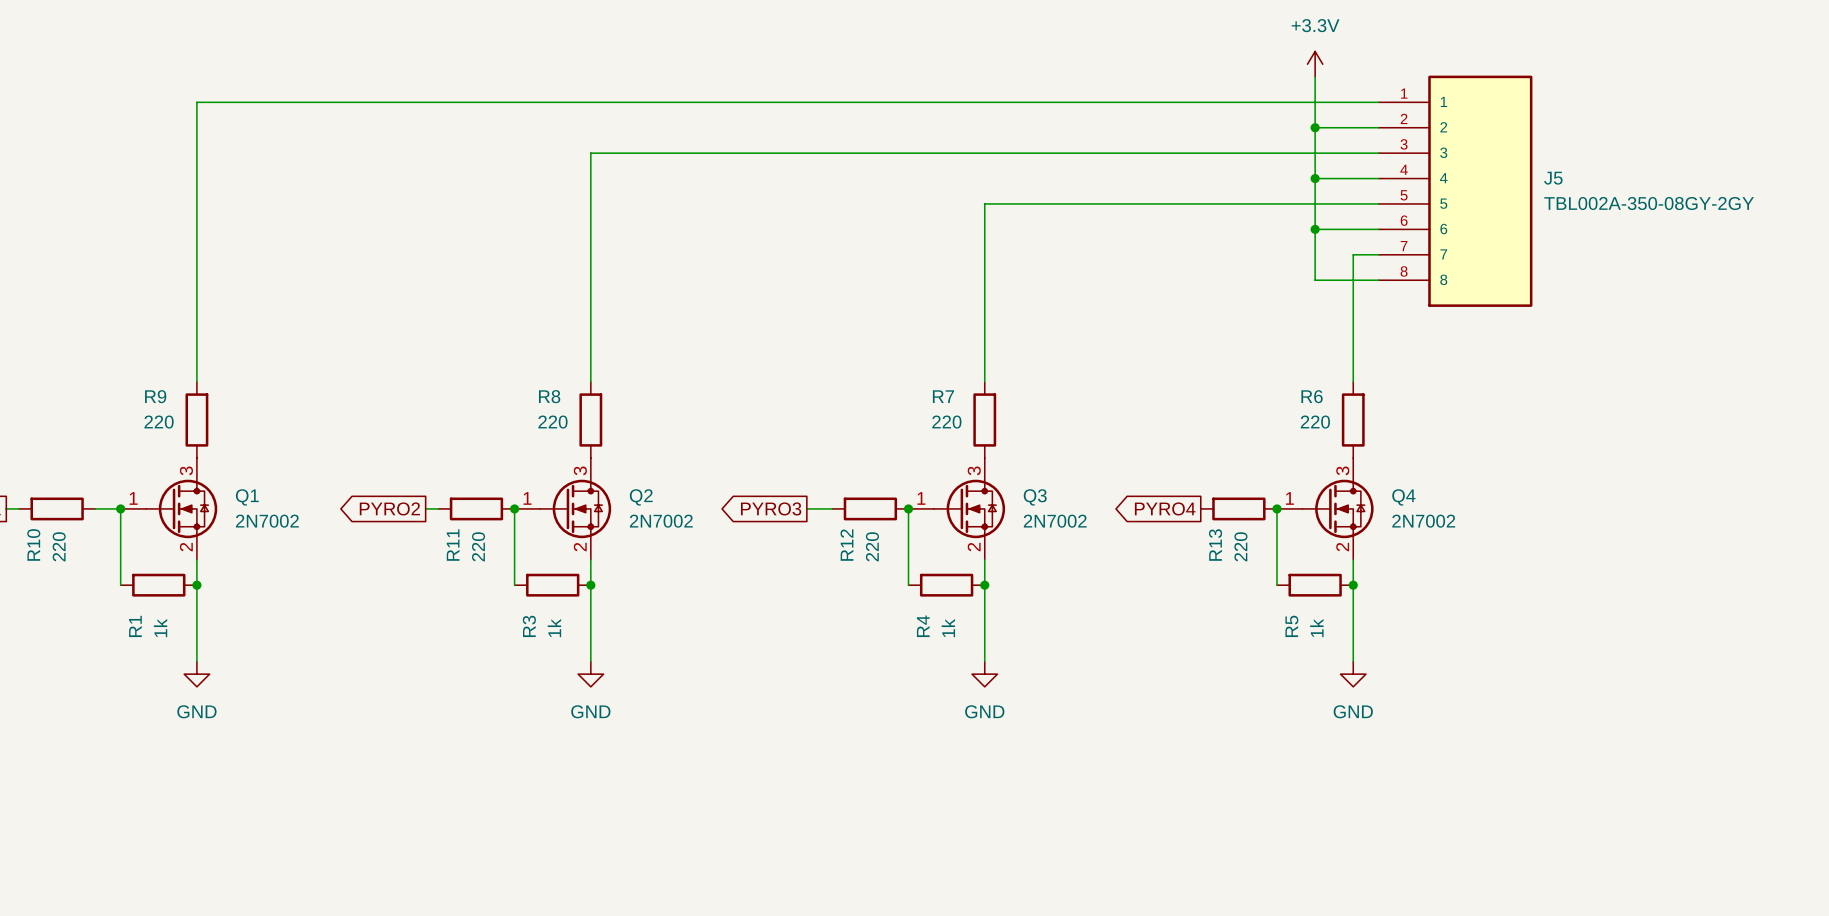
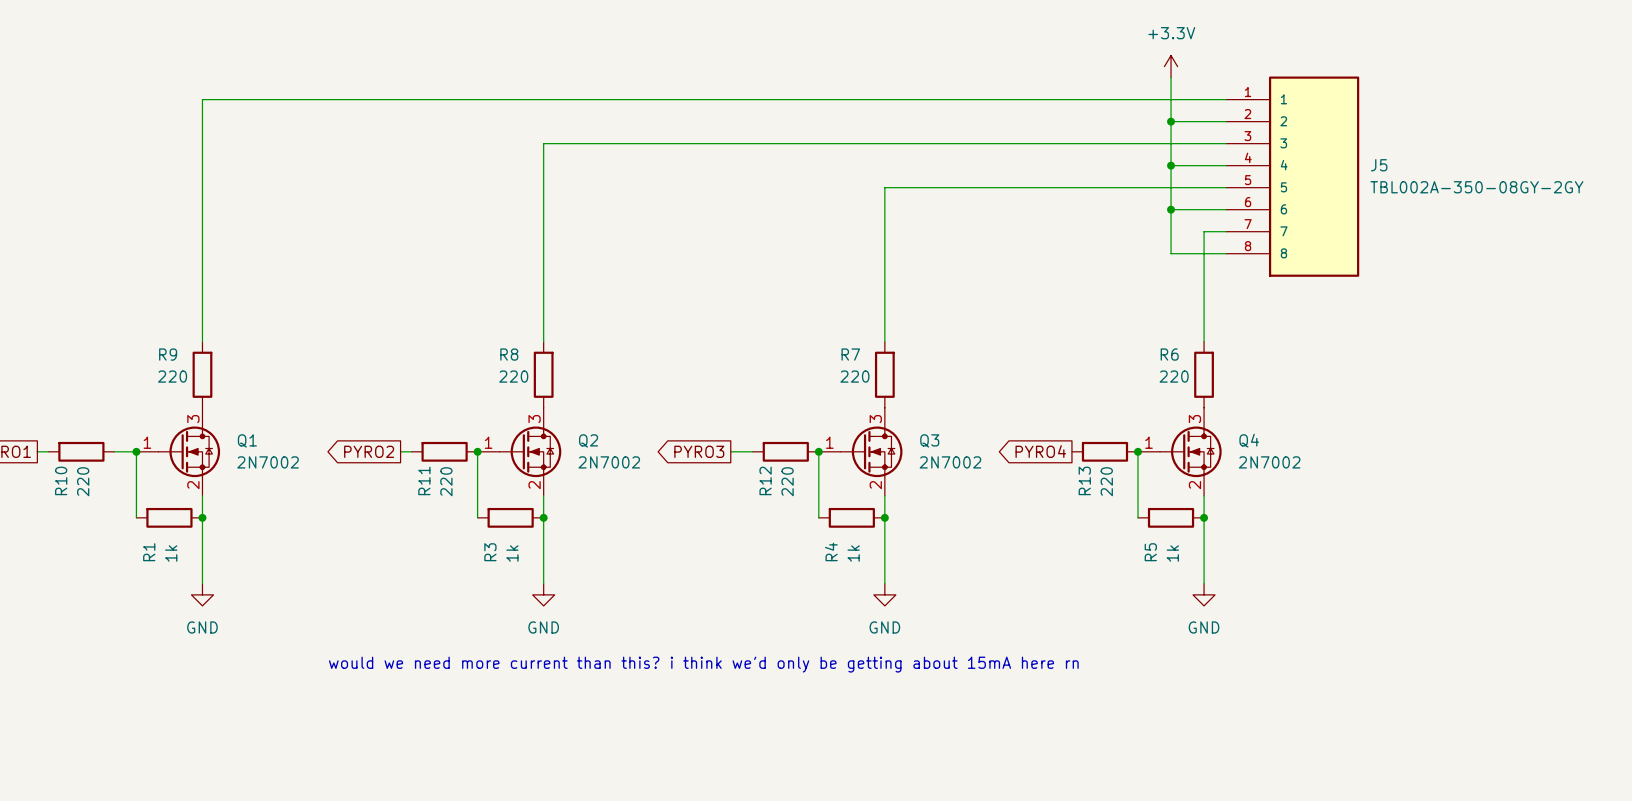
text: none -> would we need more current than this? i think we'd only be getting about 15mA here rn (703, 664)

